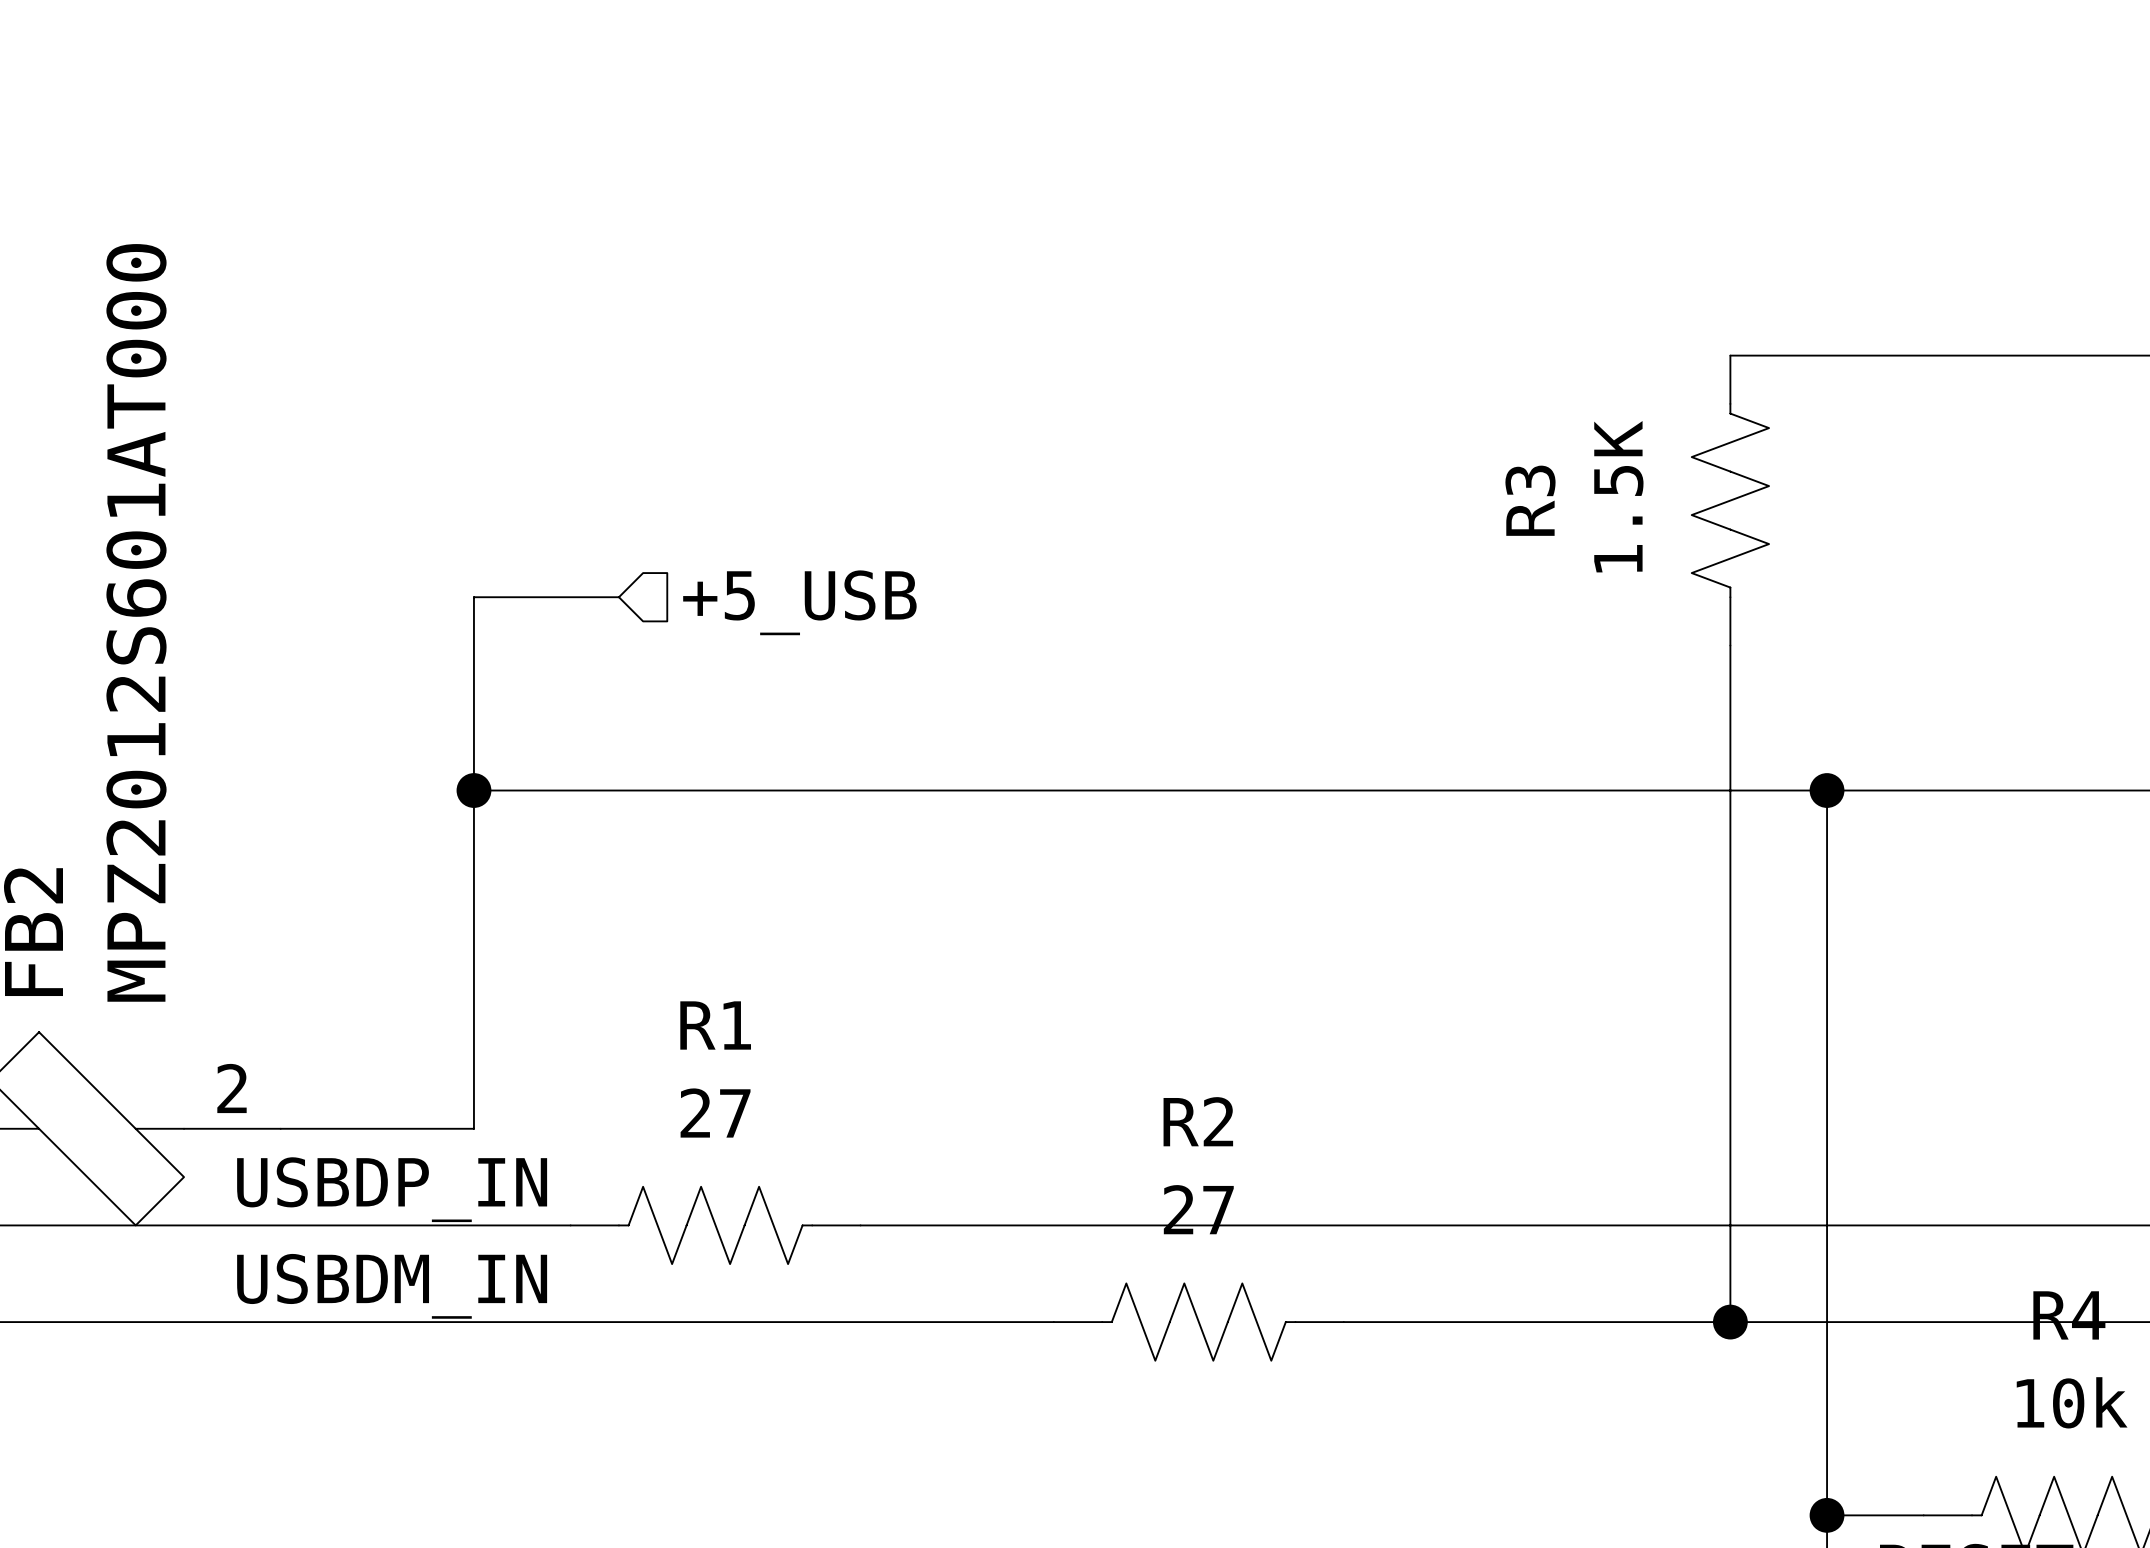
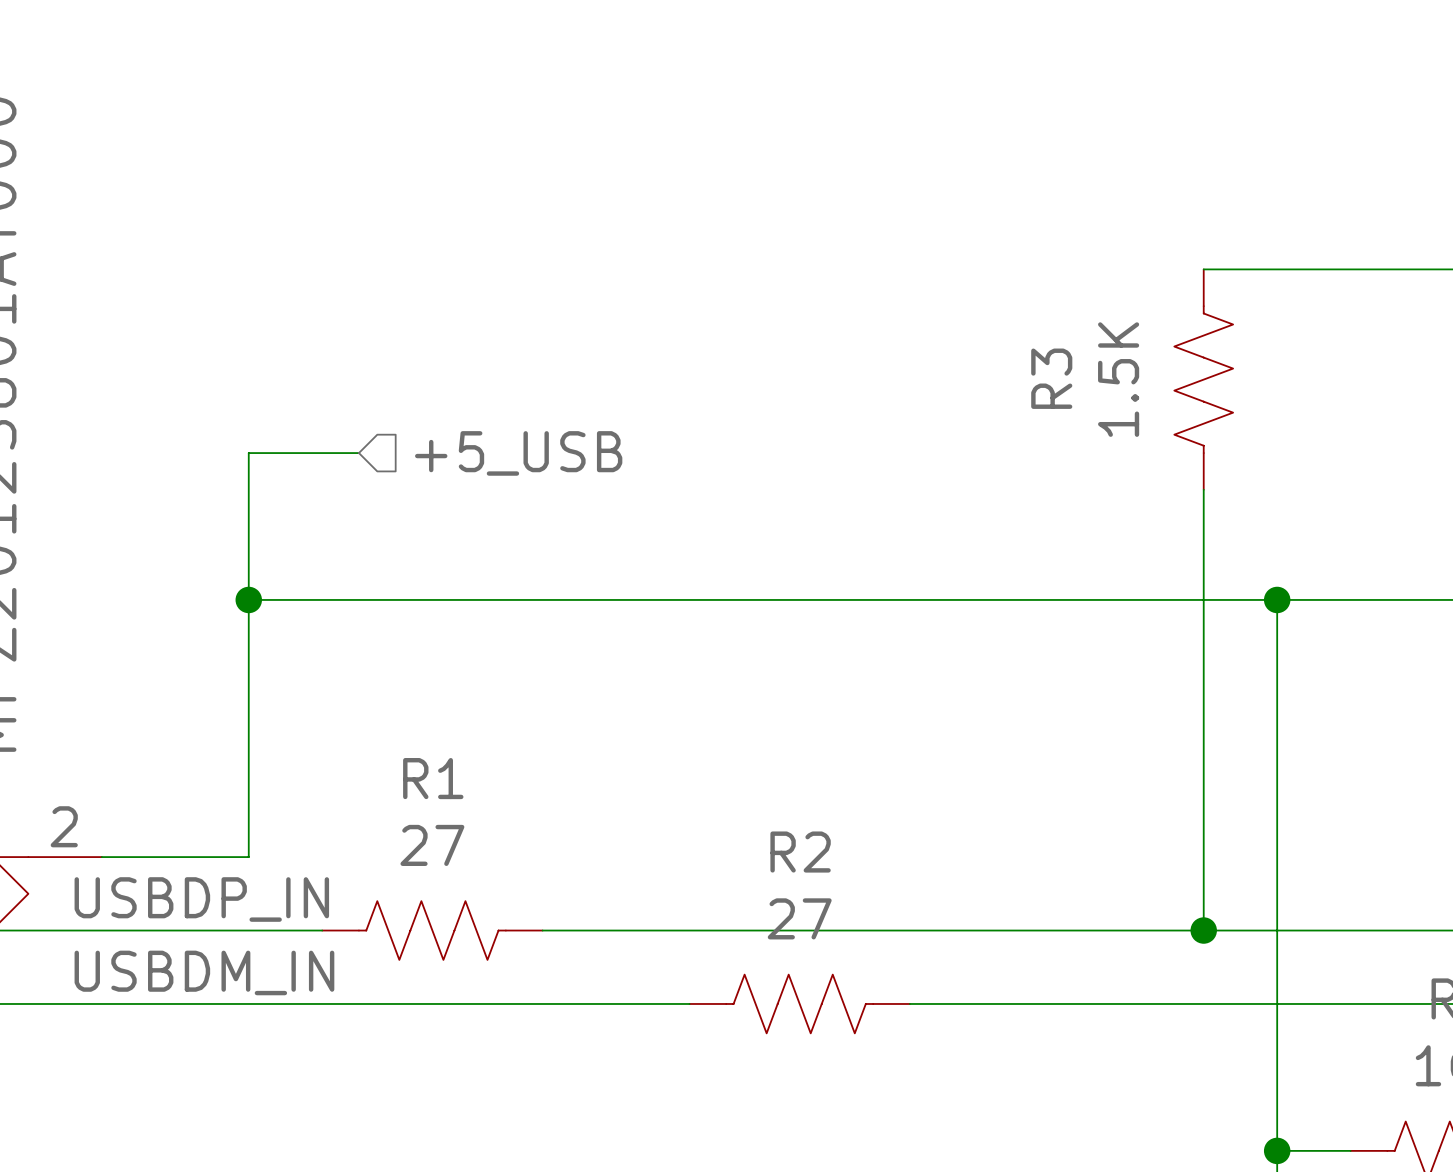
wire: (1730, 1225) (1730, 1322) -> none
junction position: (1730, 1322) -> (1203, 930)

